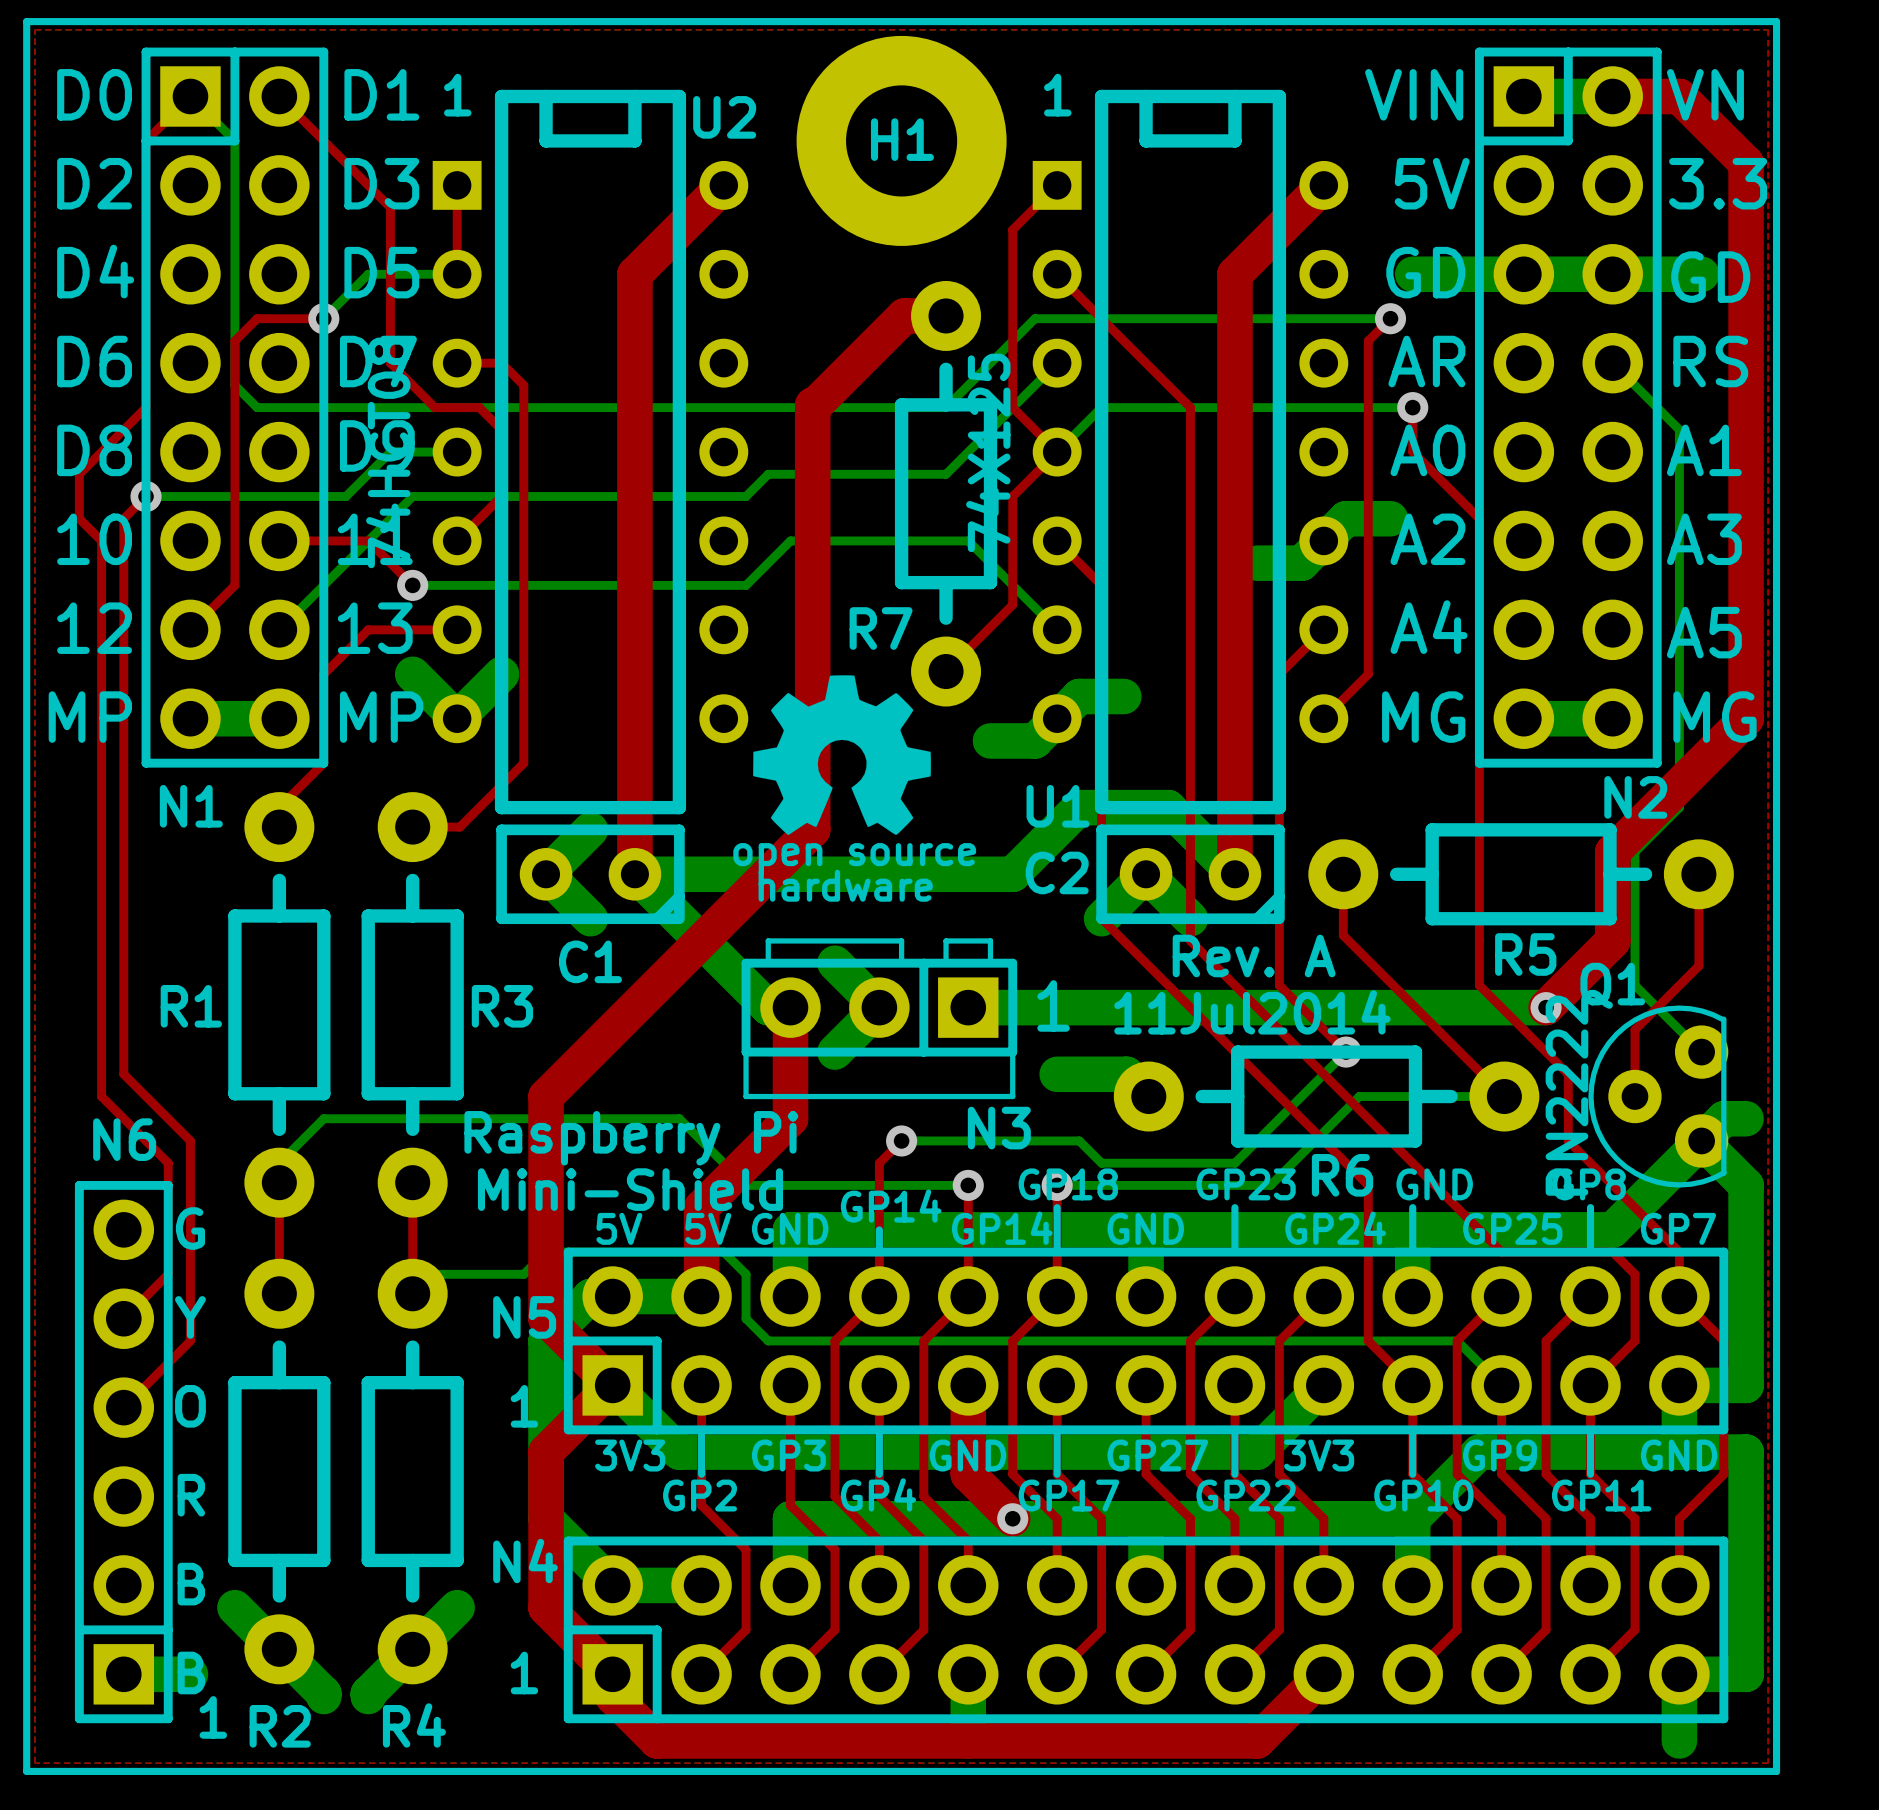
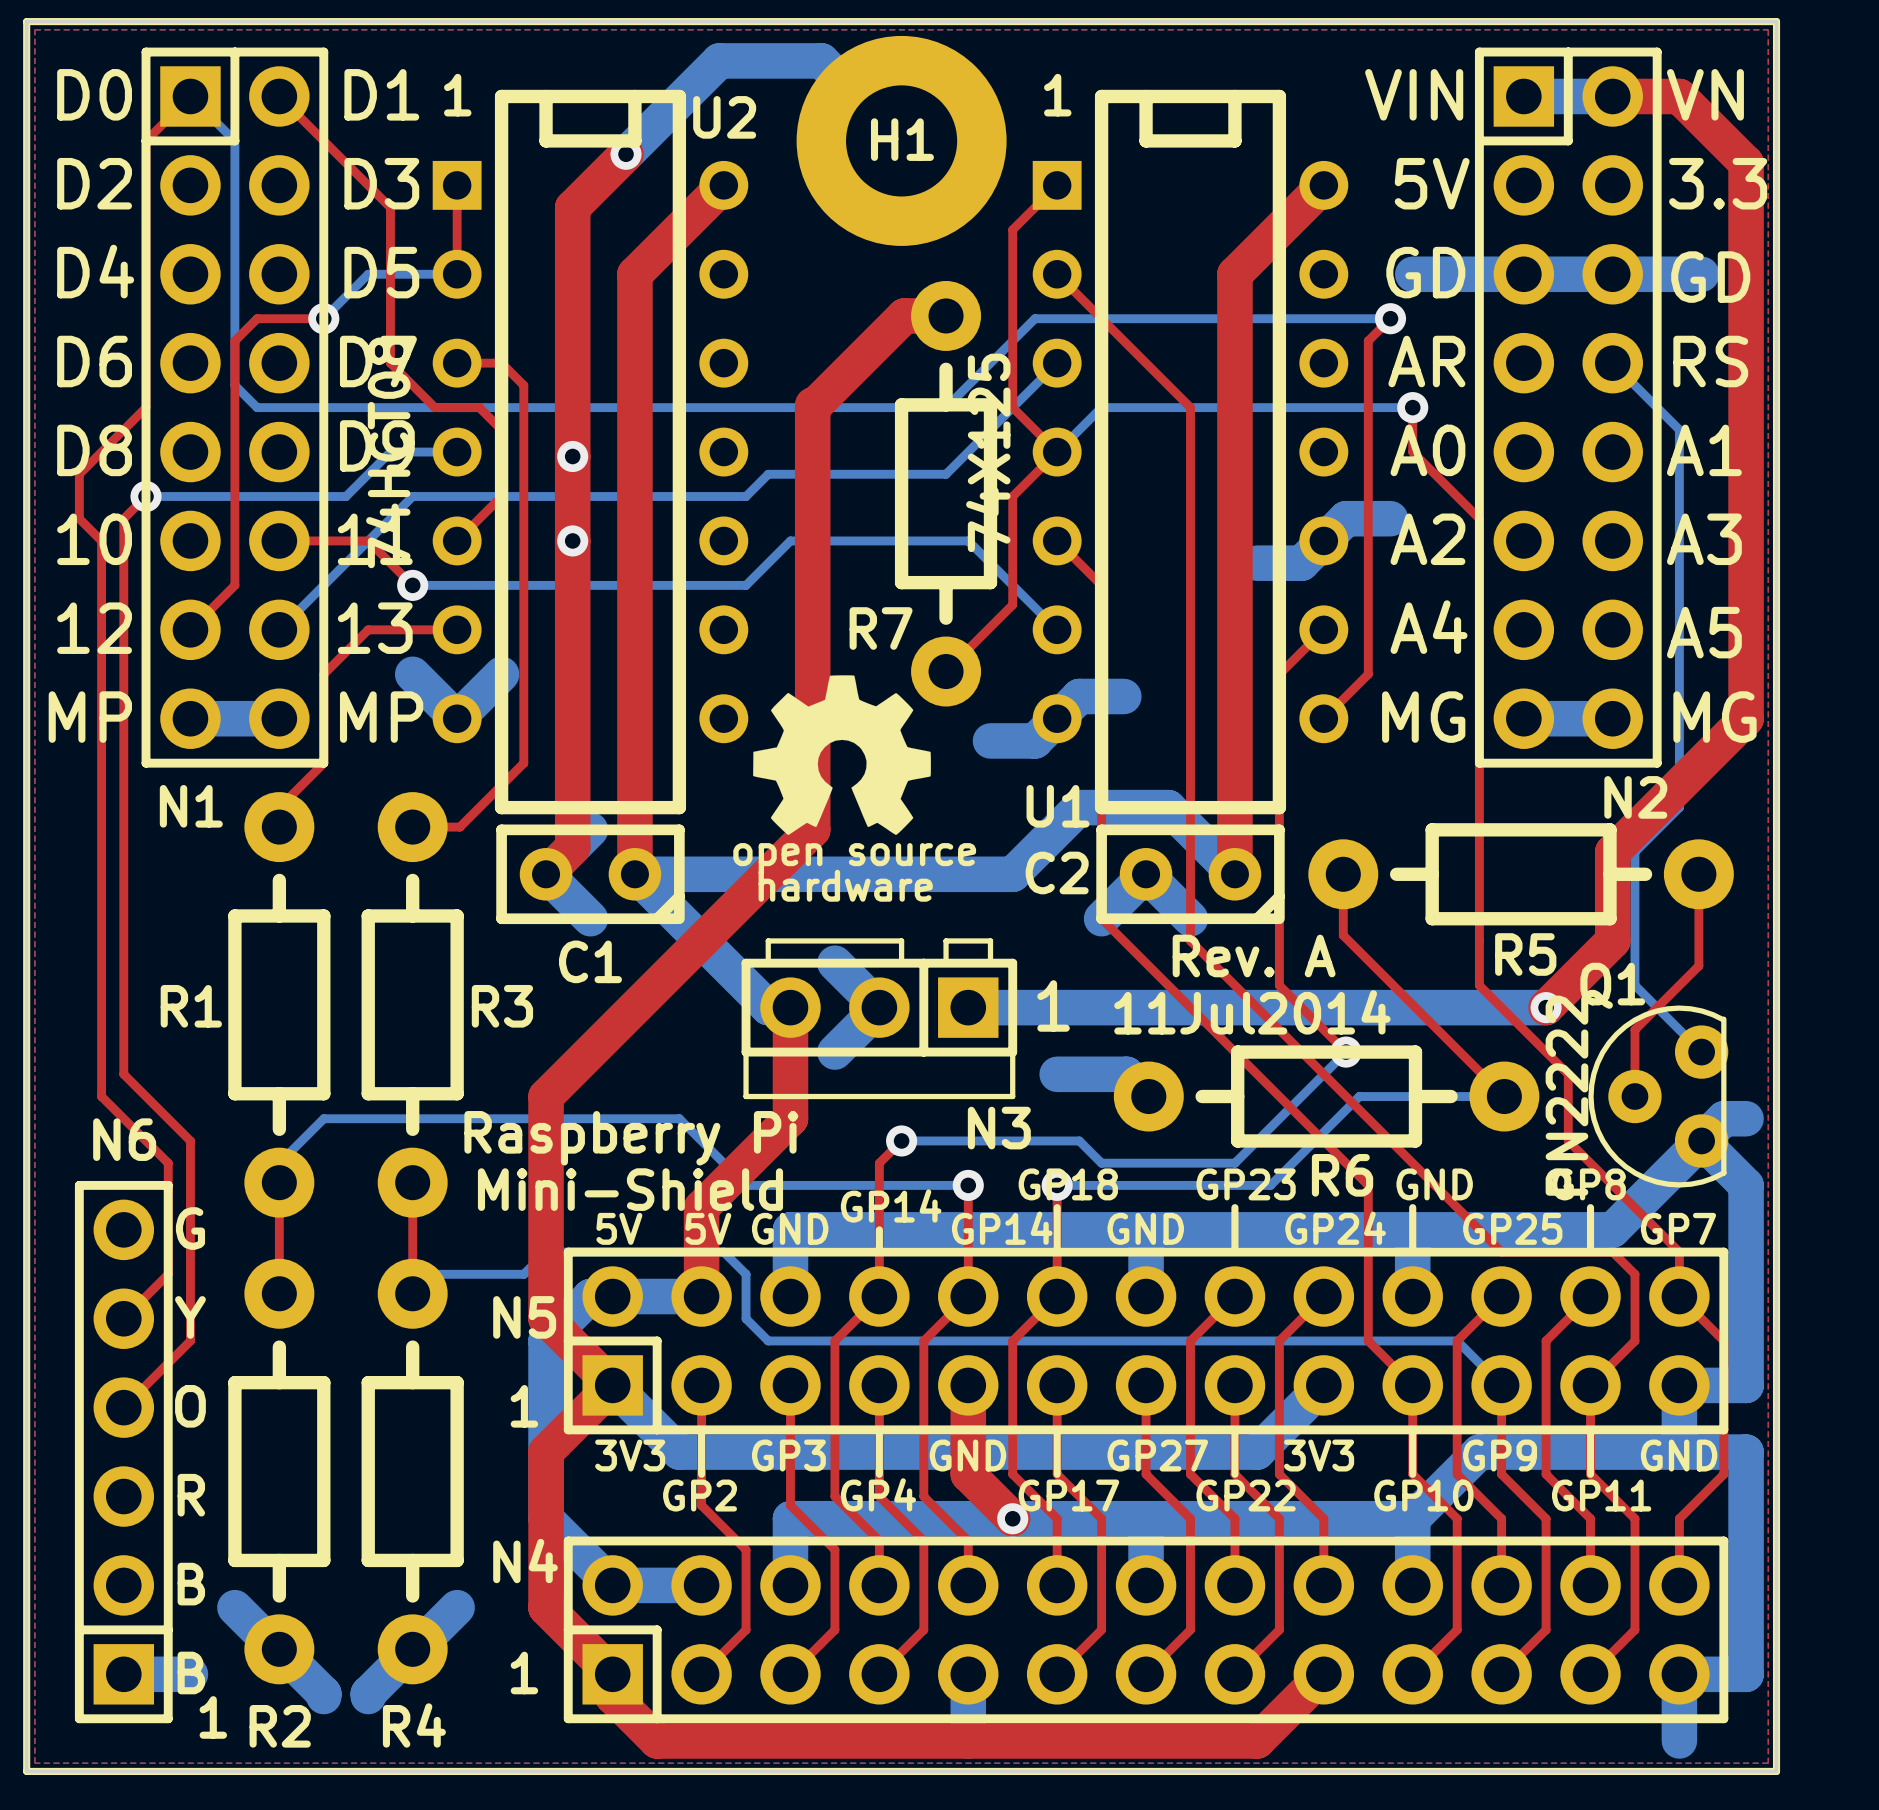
board edge: none -> (26, 21) (26, 1771) (1776, 1771) (1776, 21) (26, 21)
bottom track: none -> (901, 140) (821, 60) (719, 60) (626, 154)
top track: none -> (626, 154) (572, 207) (572, 847) (546, 874)
via: none -> (626, 154)
via: none -> (572, 456)
via: none -> (572, 540)

